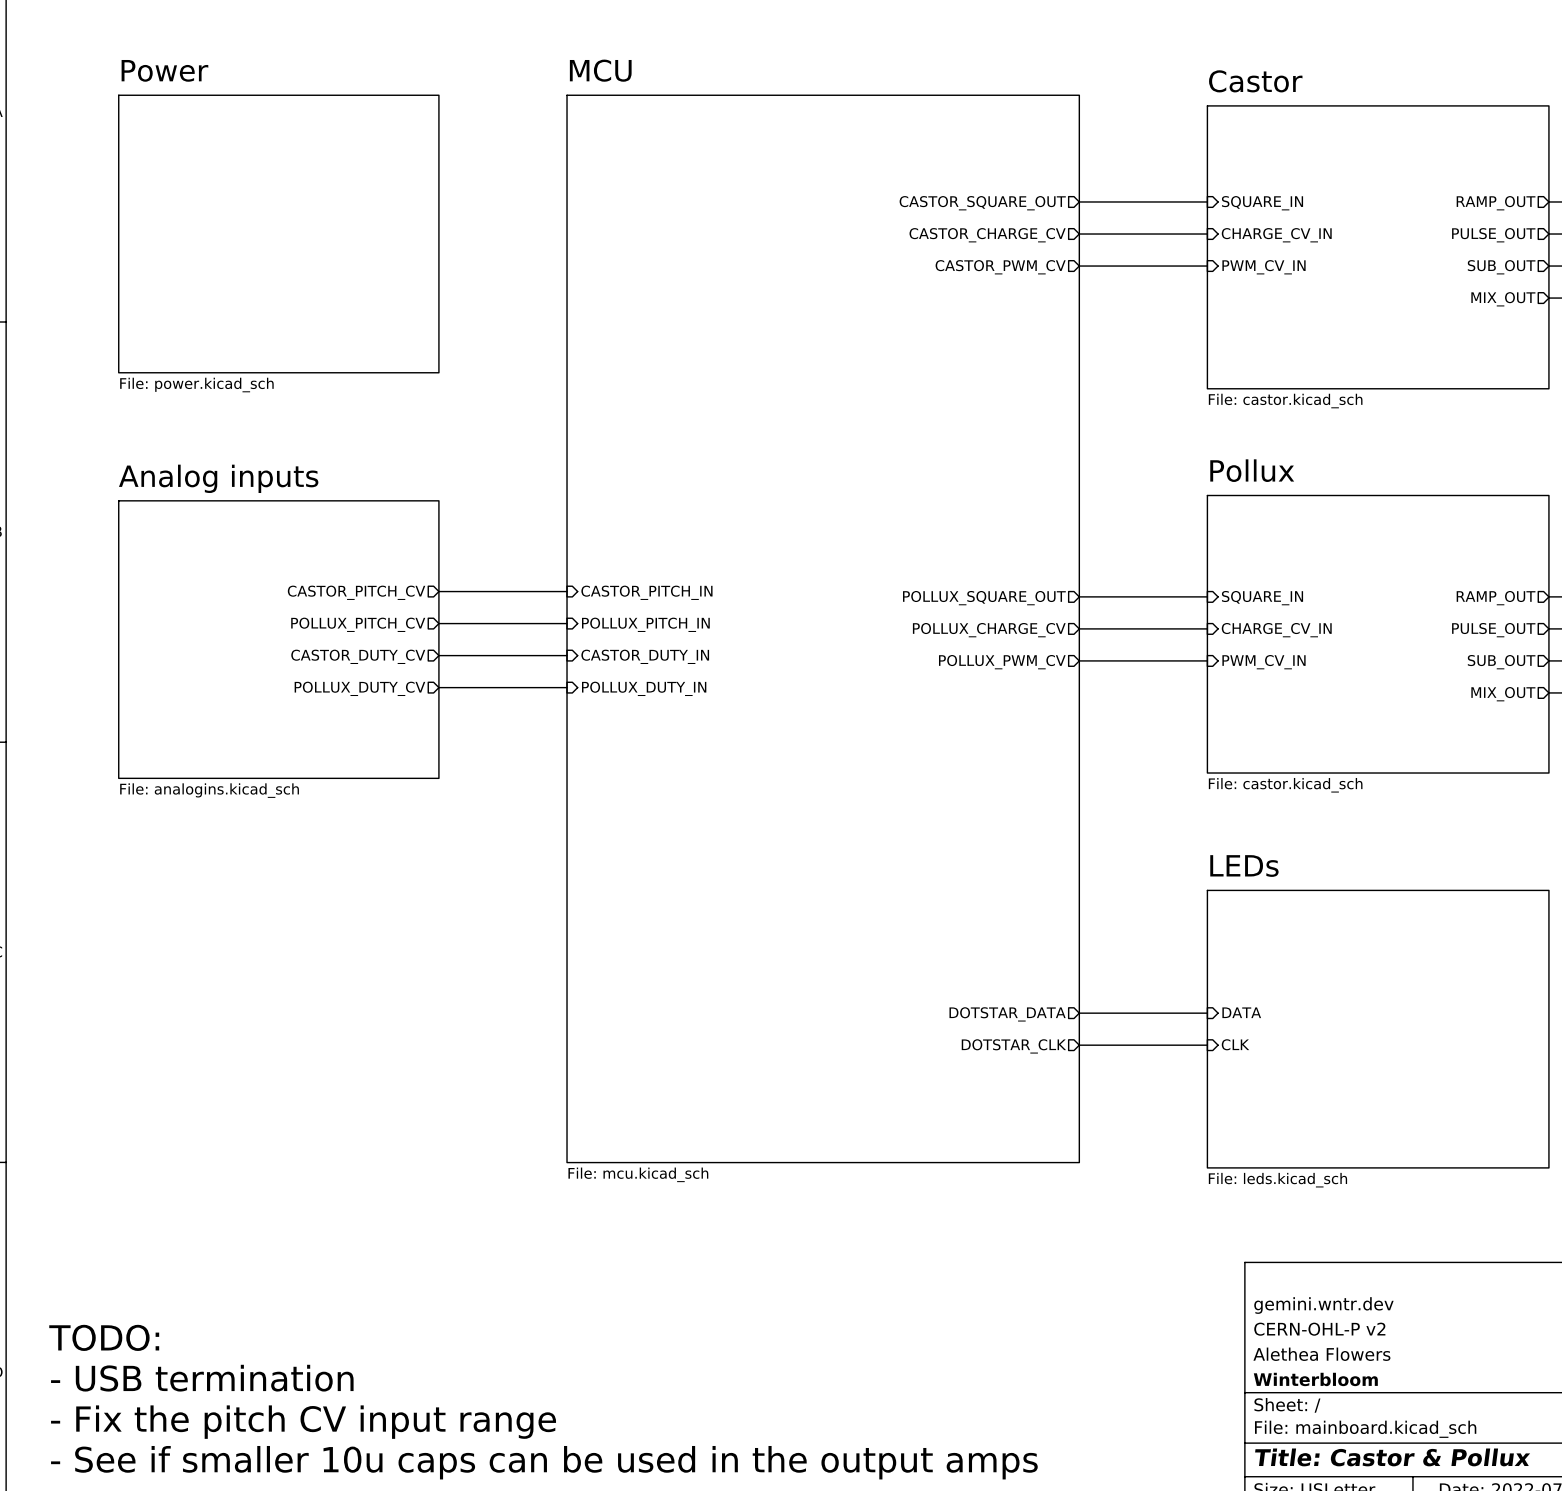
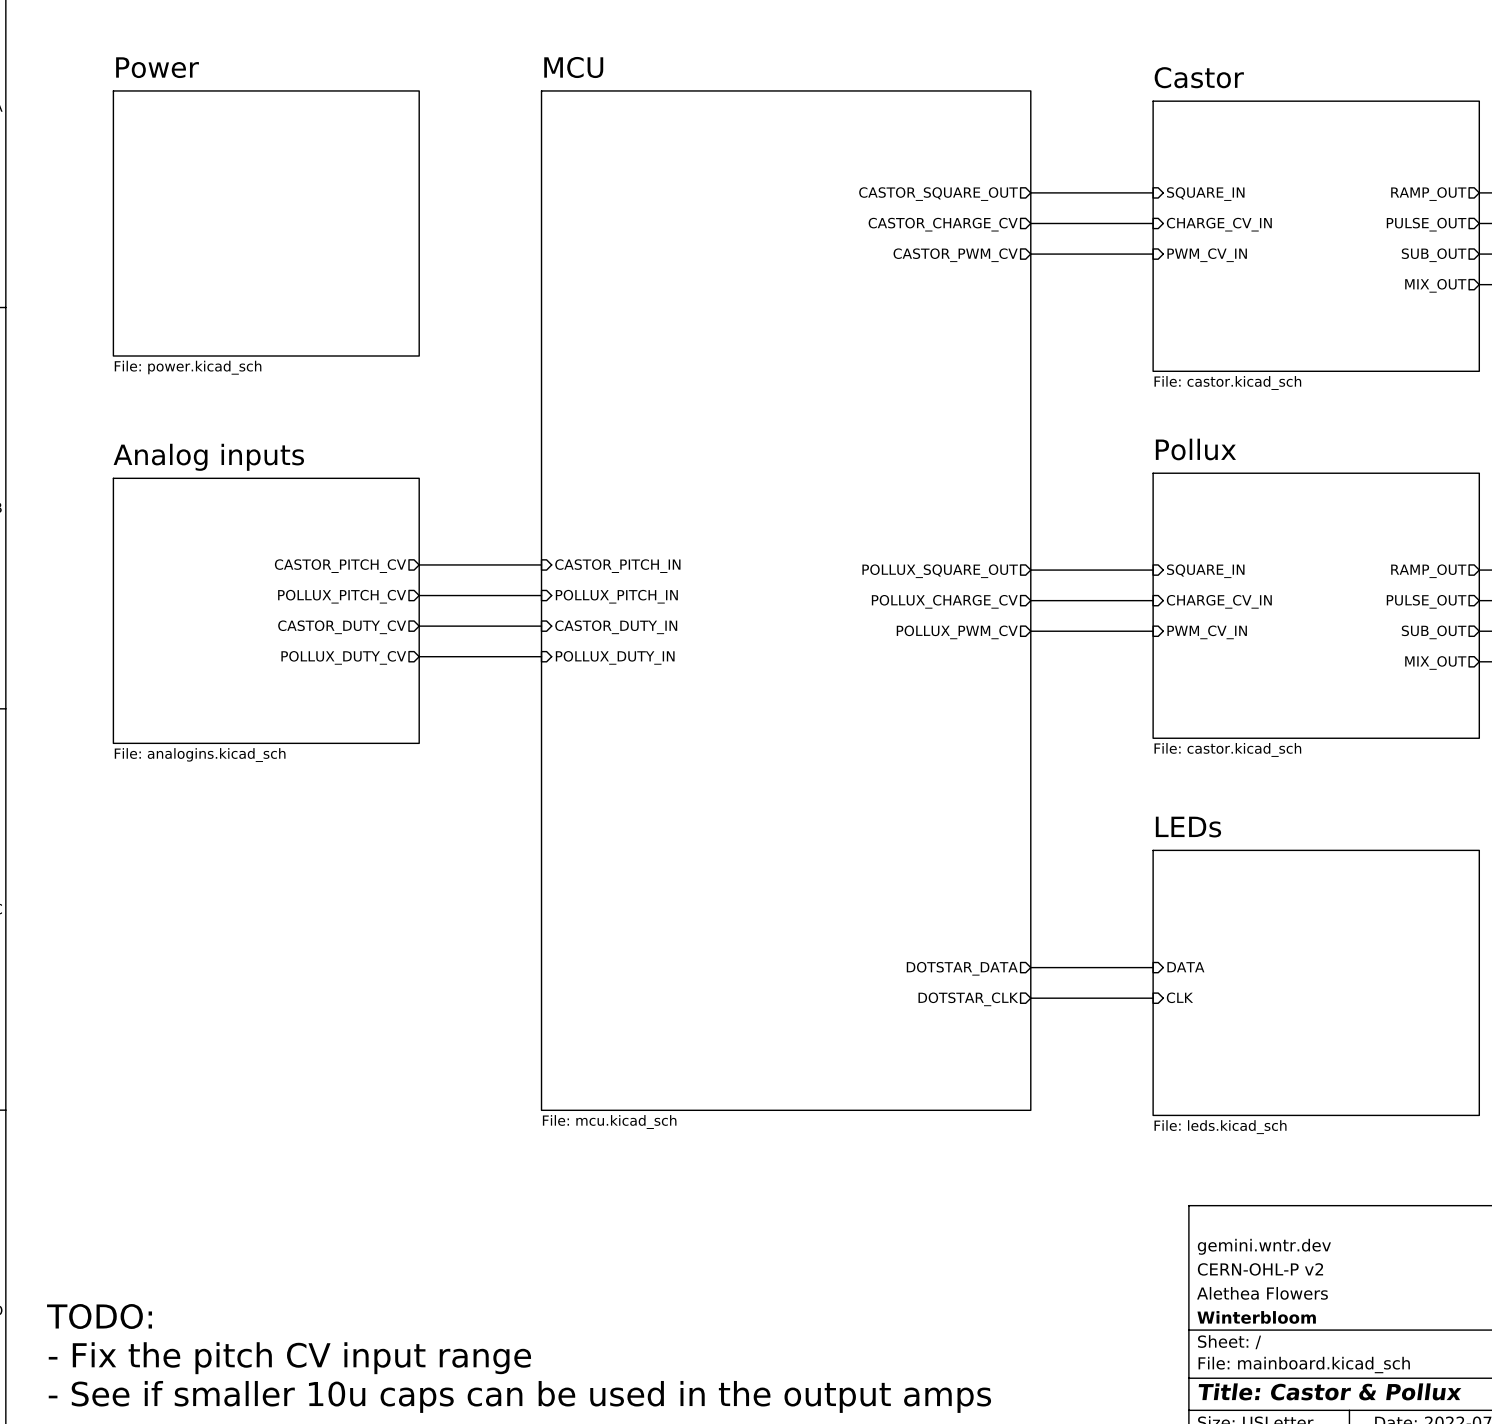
text: TODO: (104, 1337) -> none
text: - USB termination (202, 1378) -> TODO: (99, 1316)

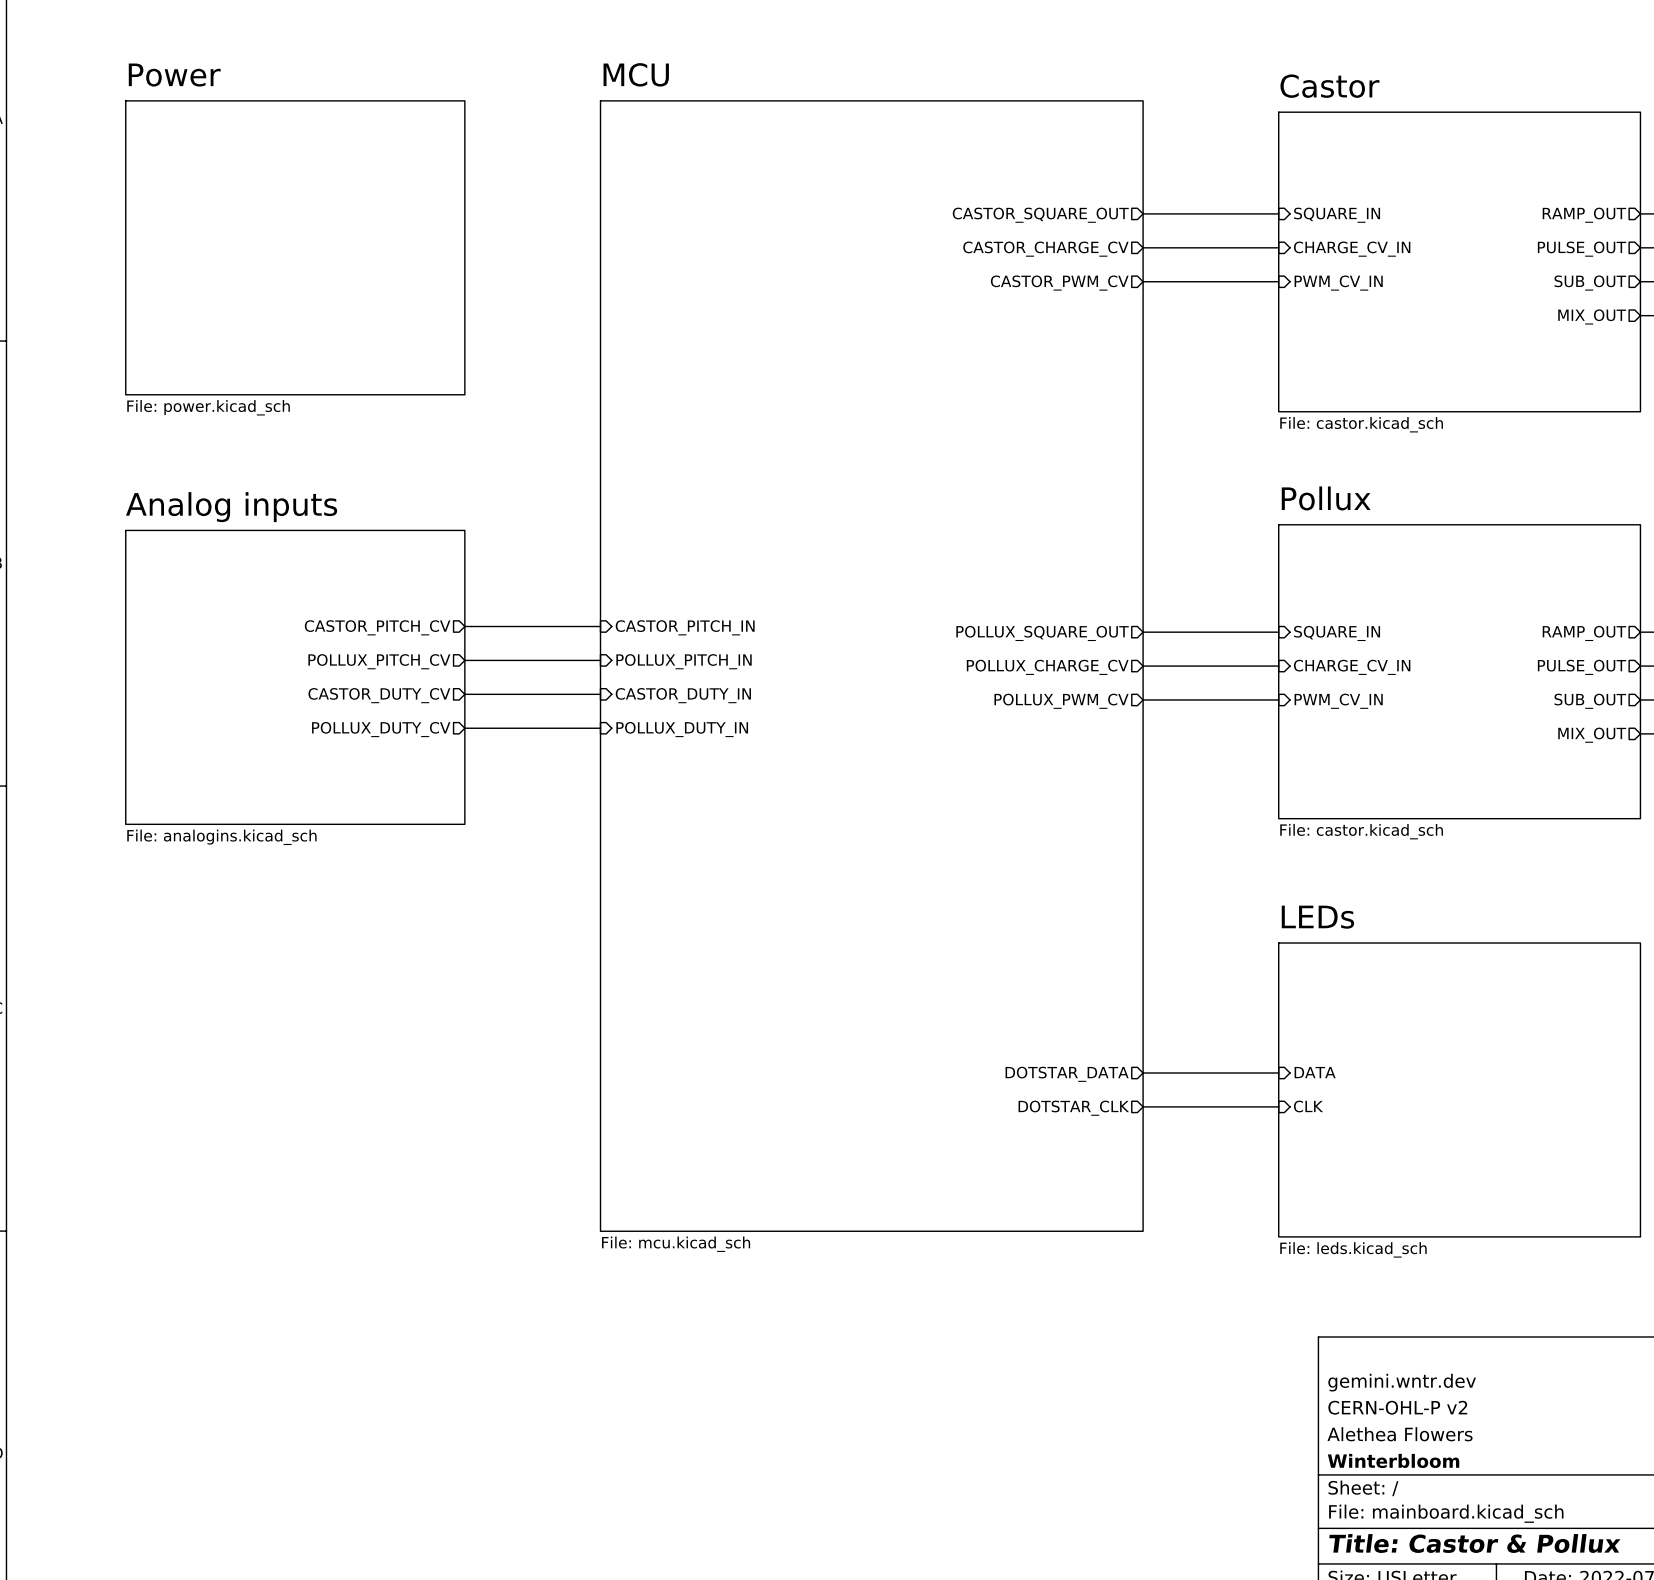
text: TODO: (99, 1316) -> none
text: - Fix the pitch CV input range (289, 1358) -> none
text: - See if smaller 10u caps can be used in the output amps (519, 1396) -> none

